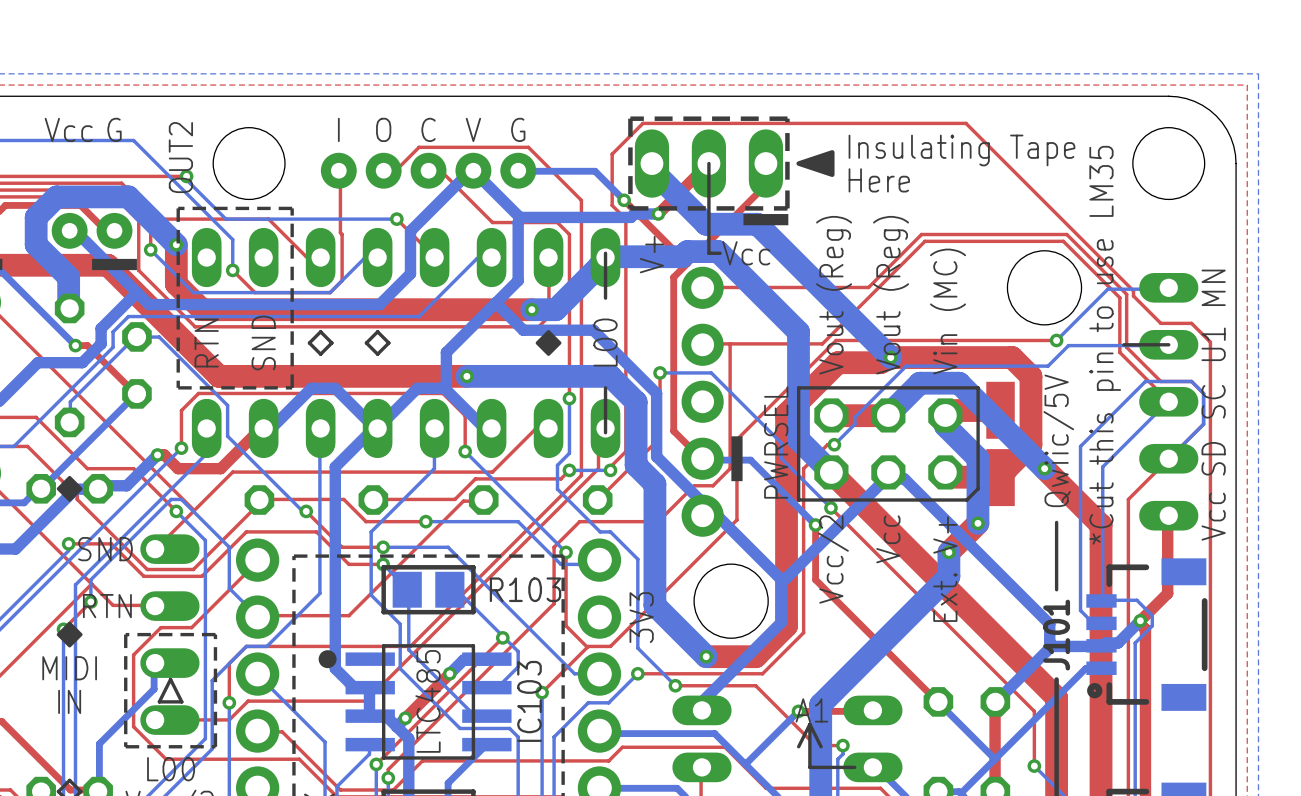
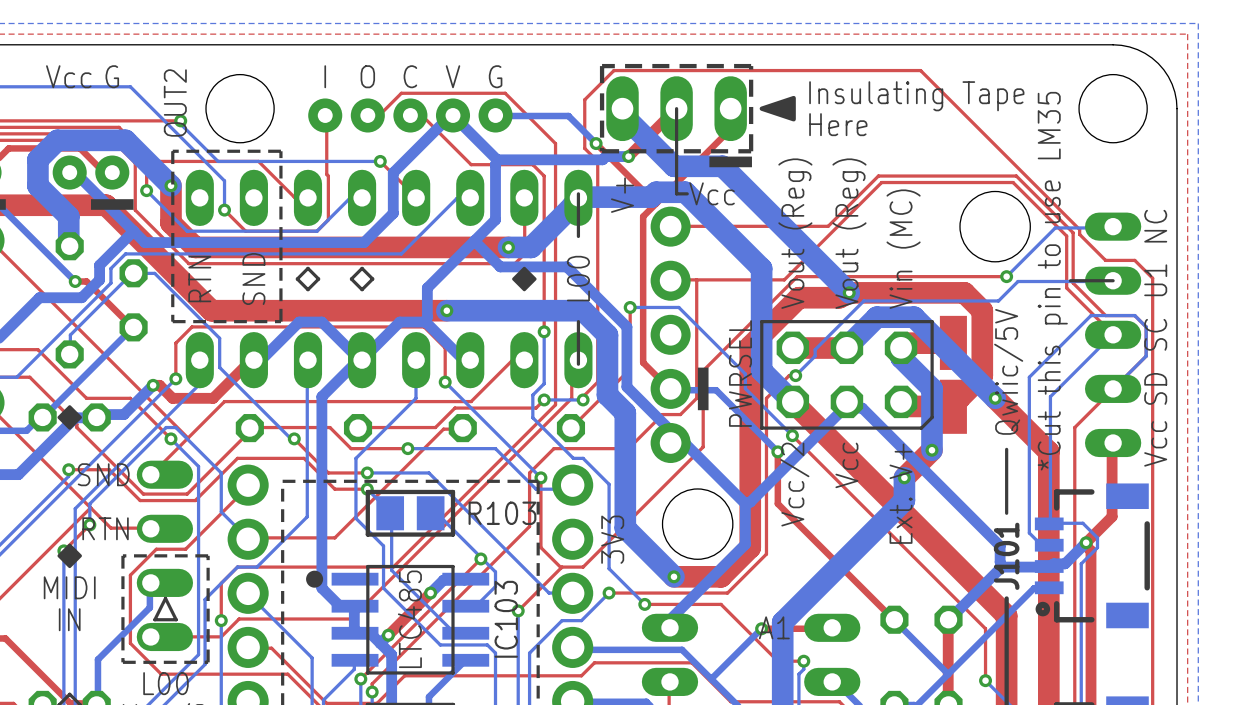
text: MN (1213, 287) -> NC (1155, 226)
line: (809, 724) (821, 746) -> none
line: (809, 724) (798, 746) -> none
line: (809, 724) (809, 767) (854, 767) -> none

